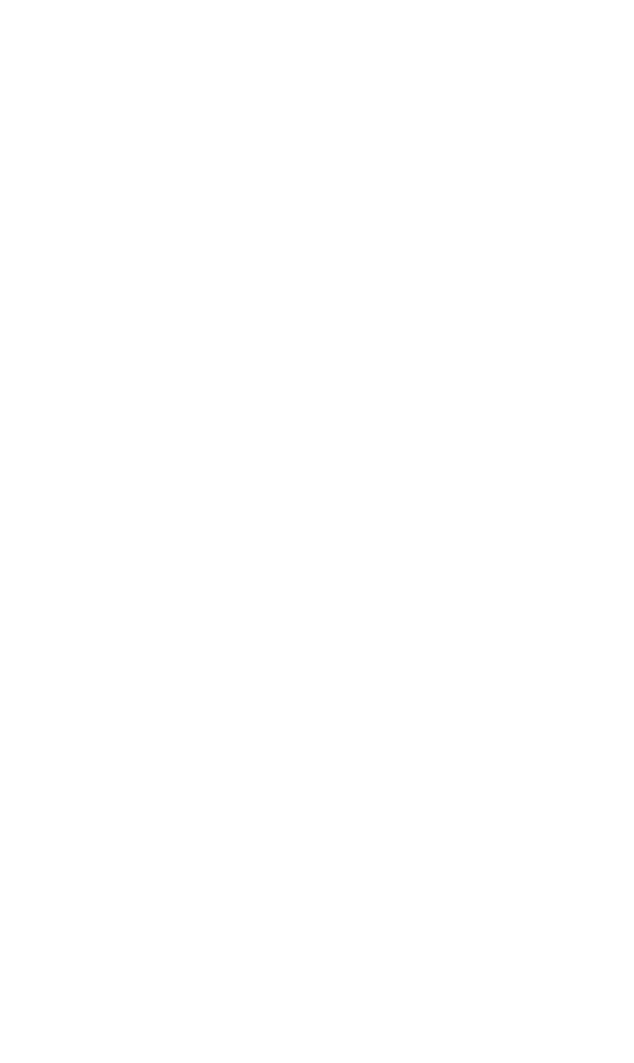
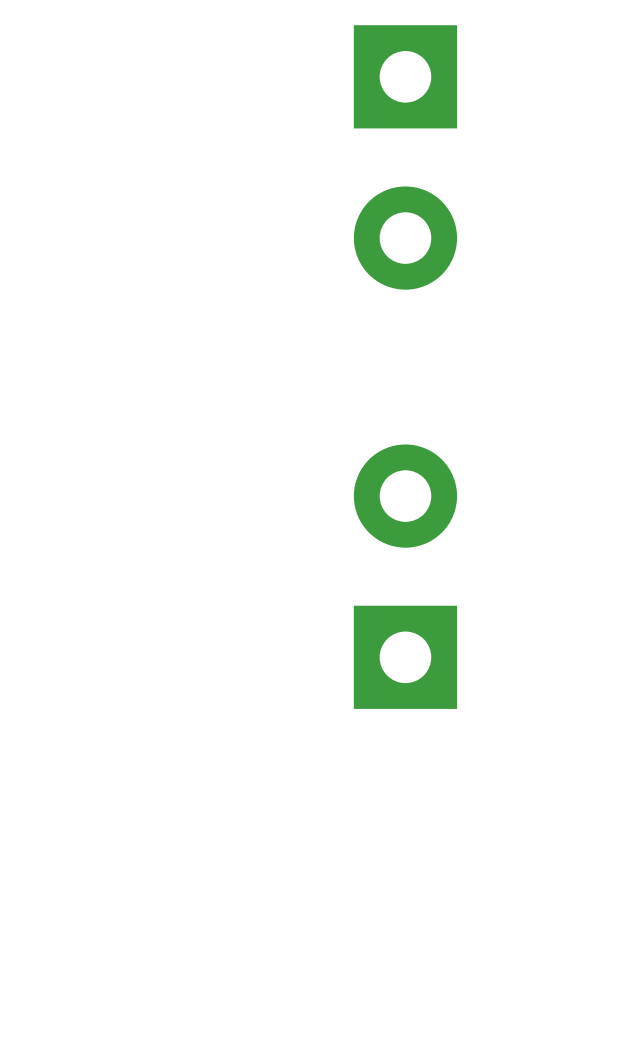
part: none -> (405, 157)
part: none -> (405, 576)

